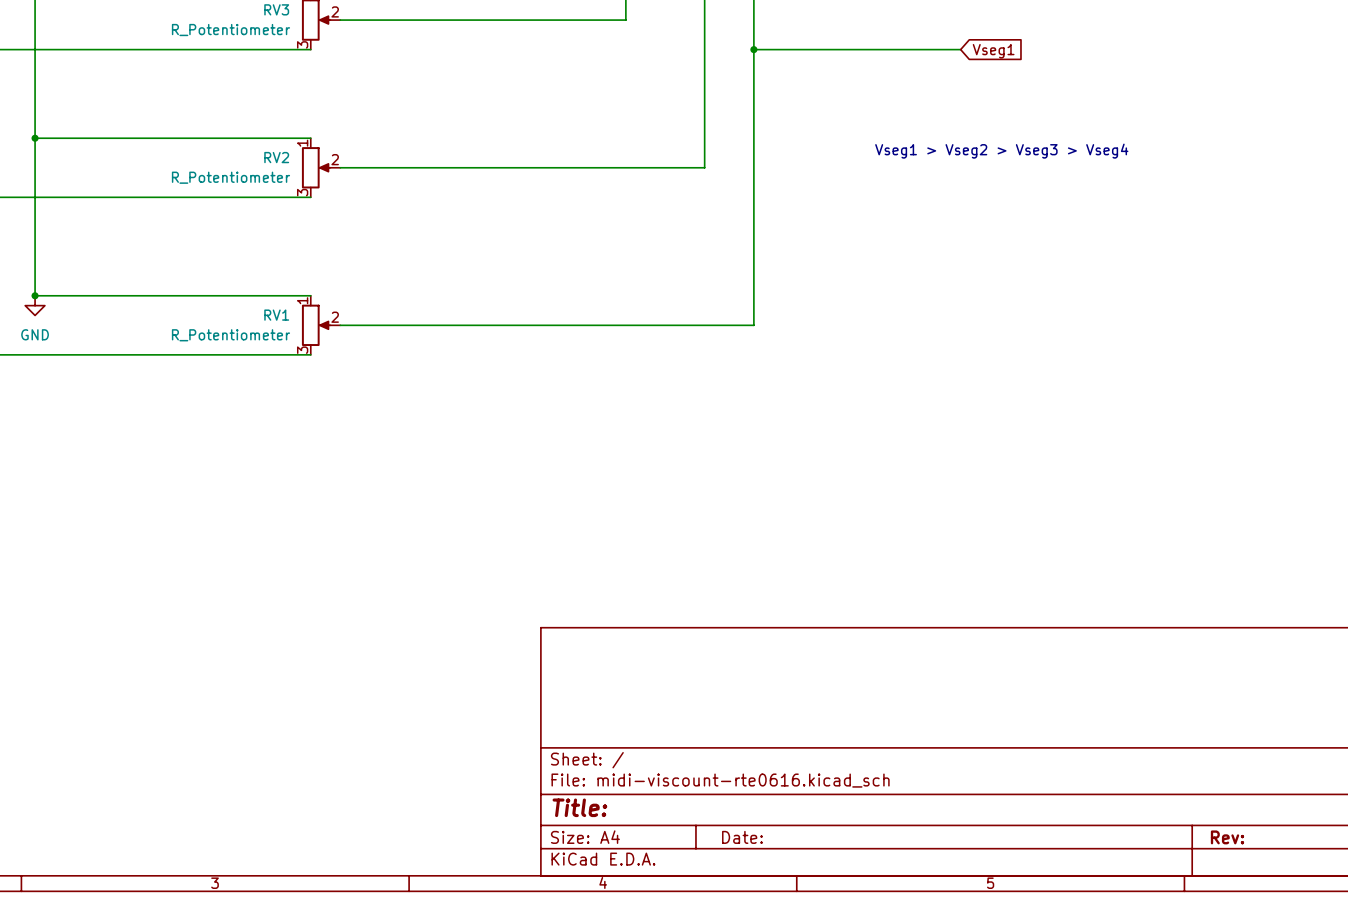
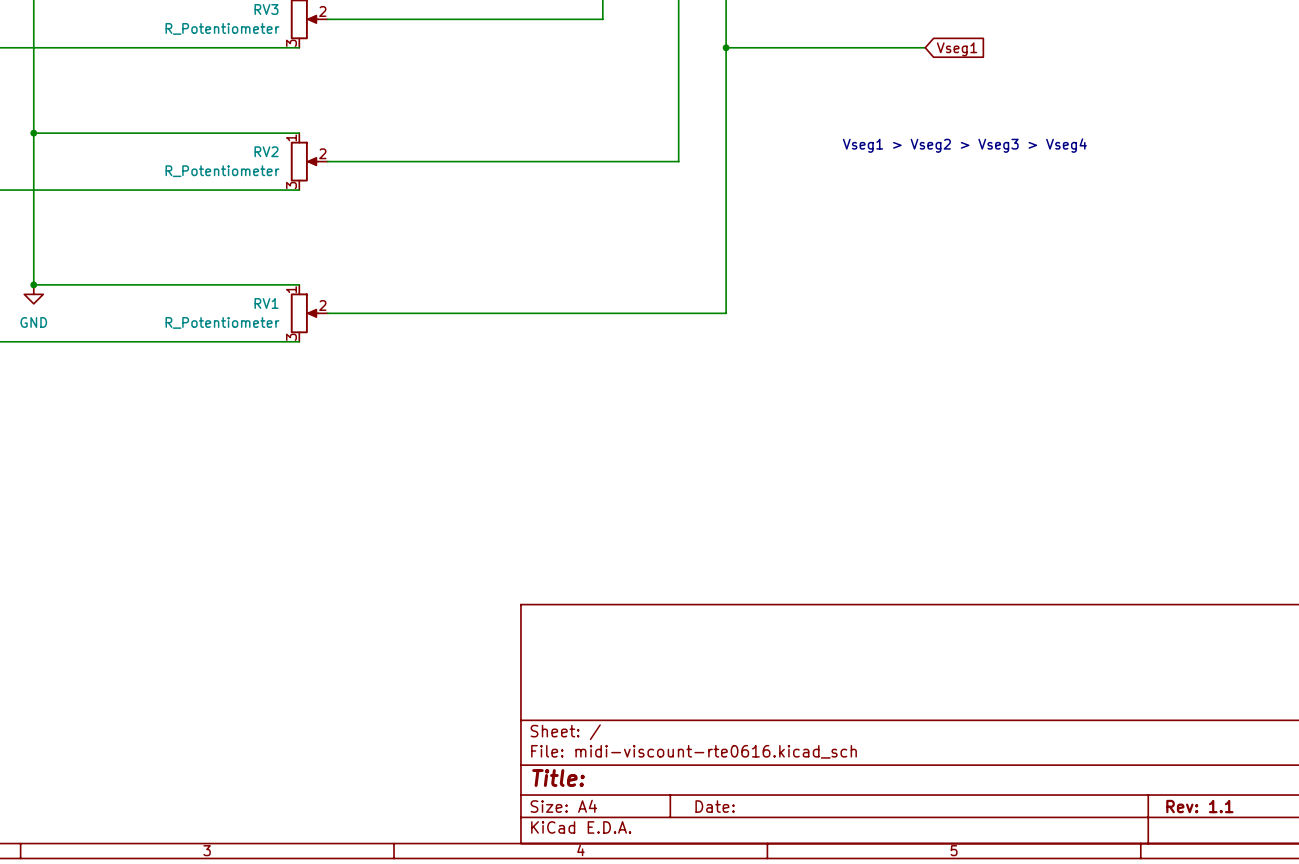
title block: Rev: (1227, 837) -> Rev: 1.1 (1199, 806)

